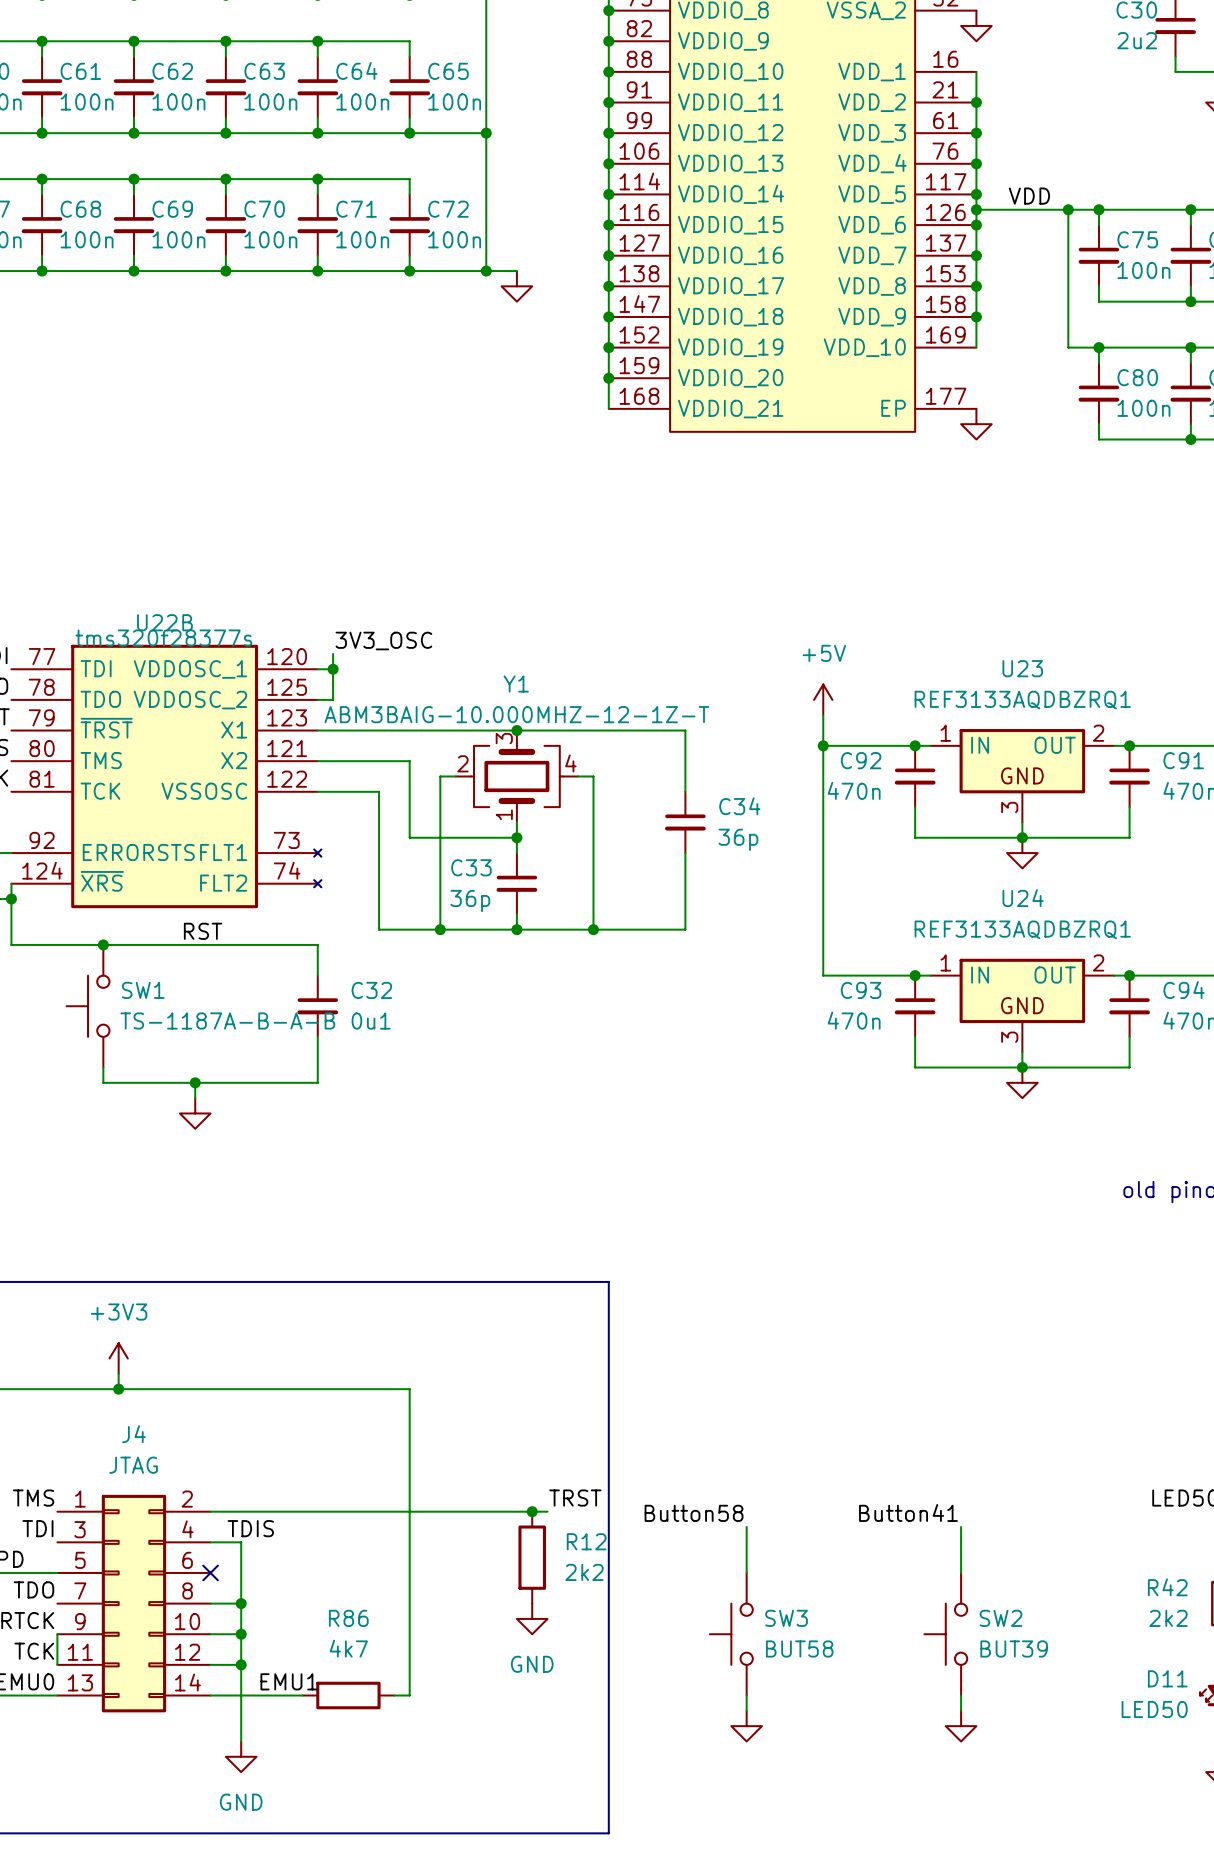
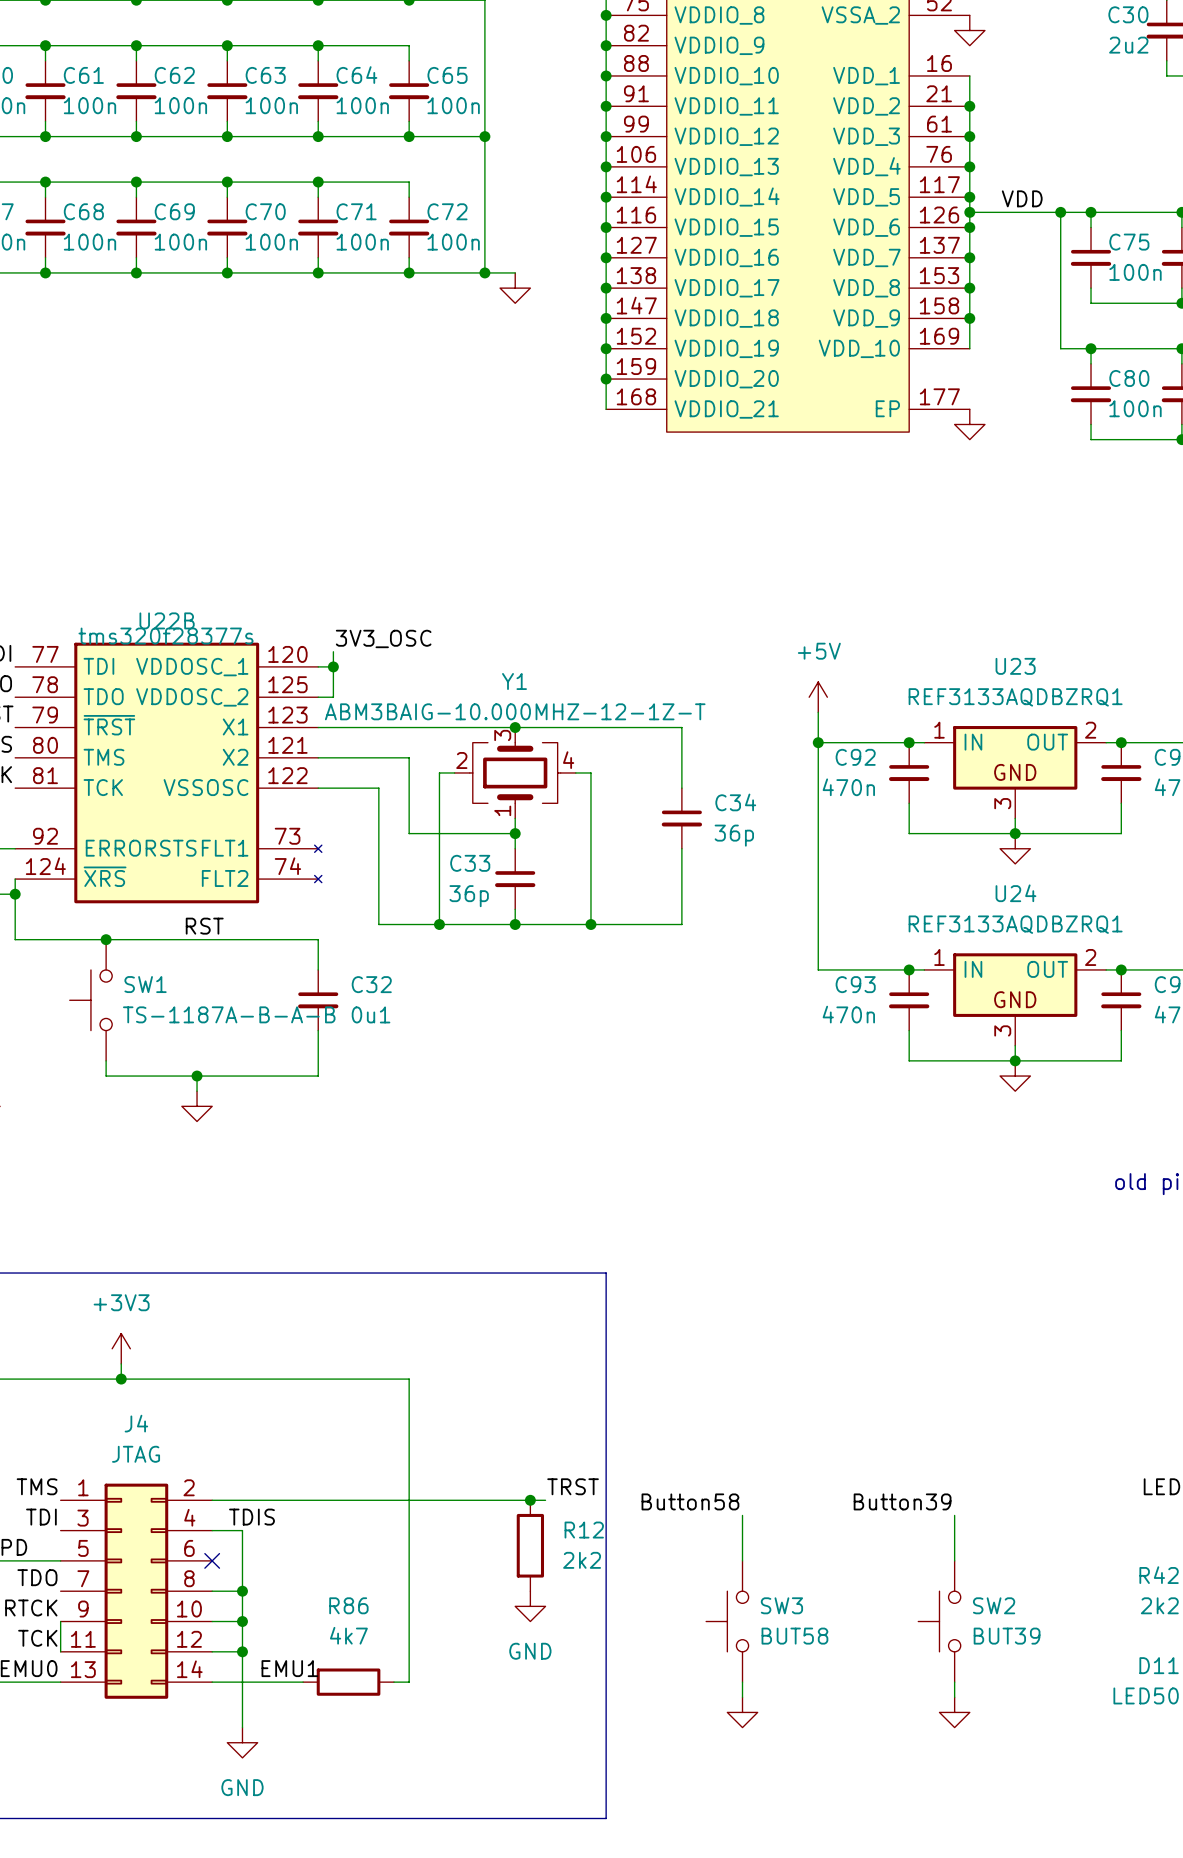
label: Button41 (908, 1512) -> Button39 (902, 1501)

